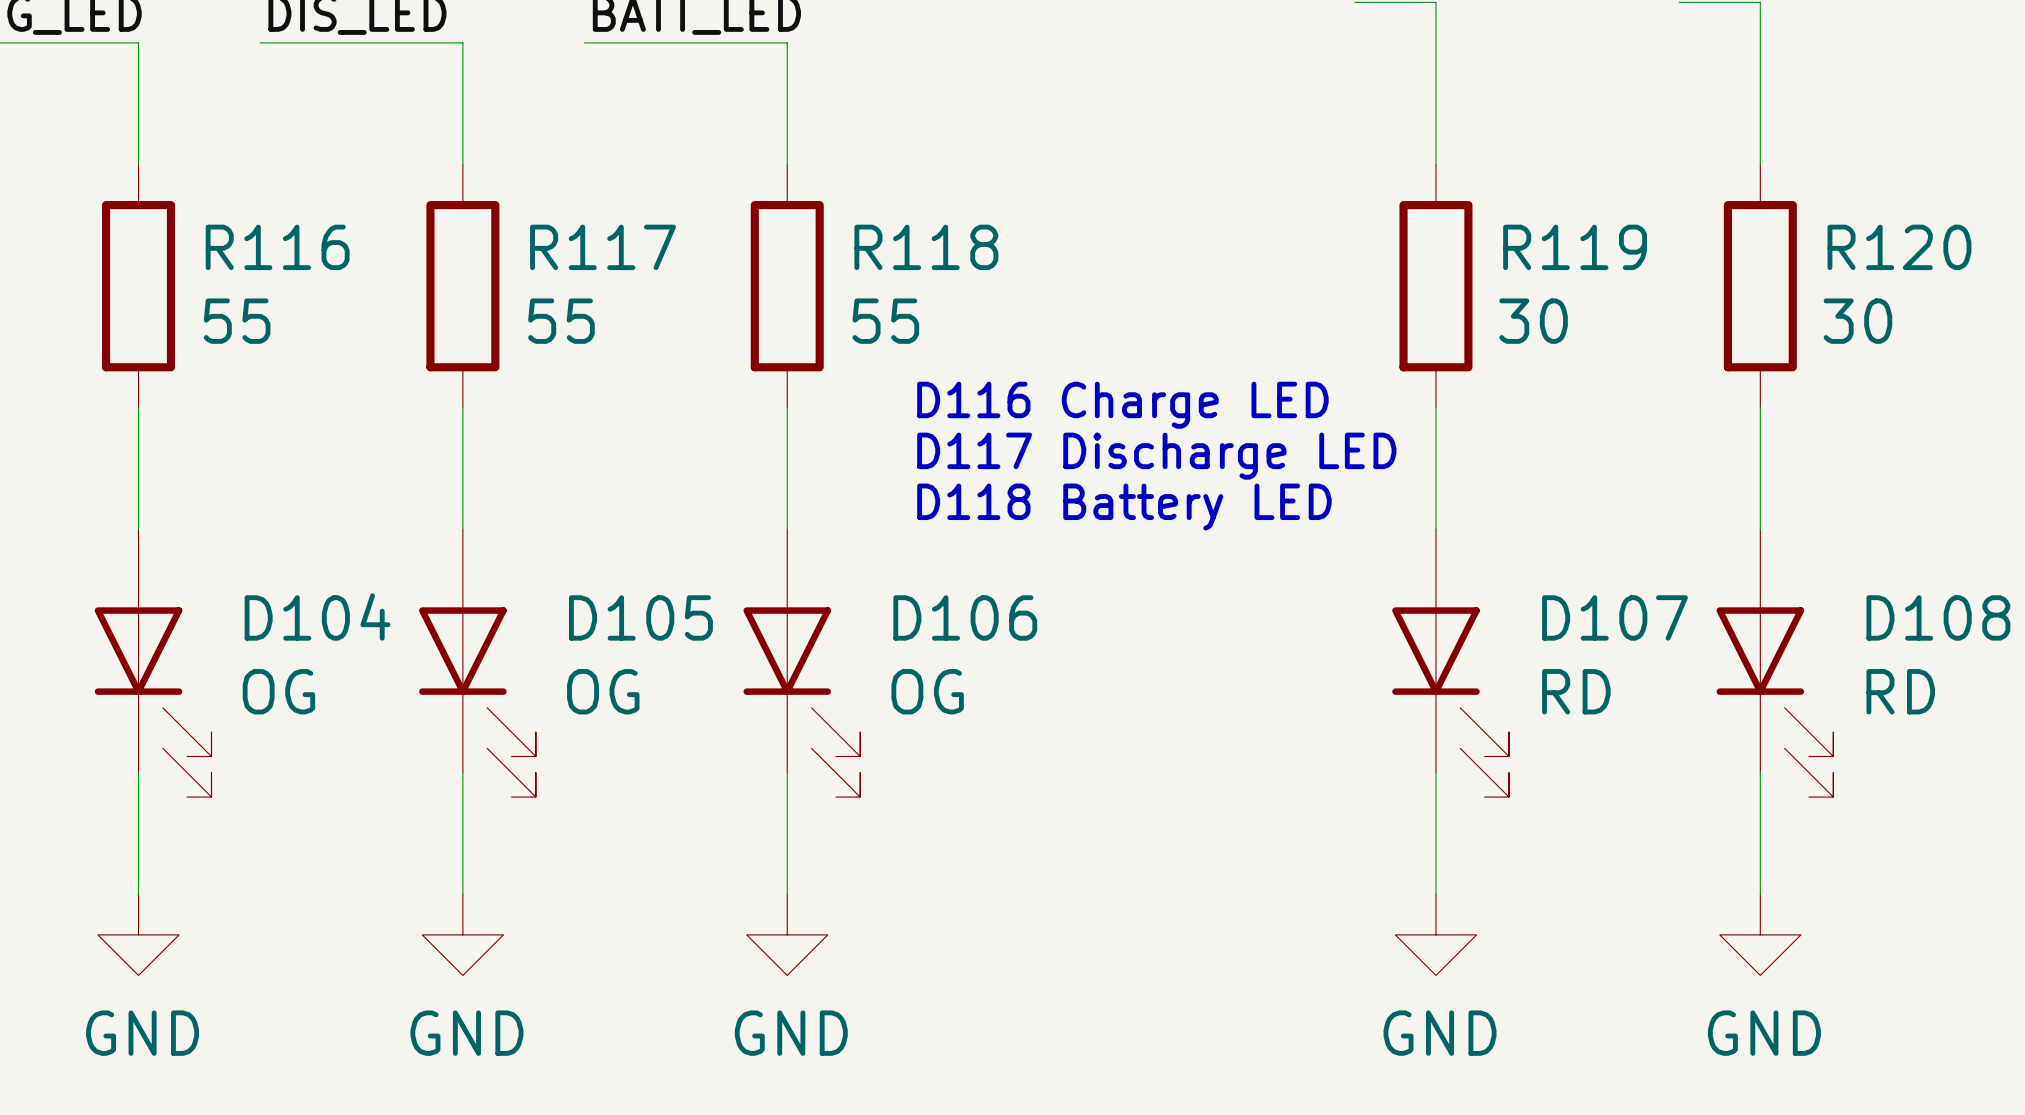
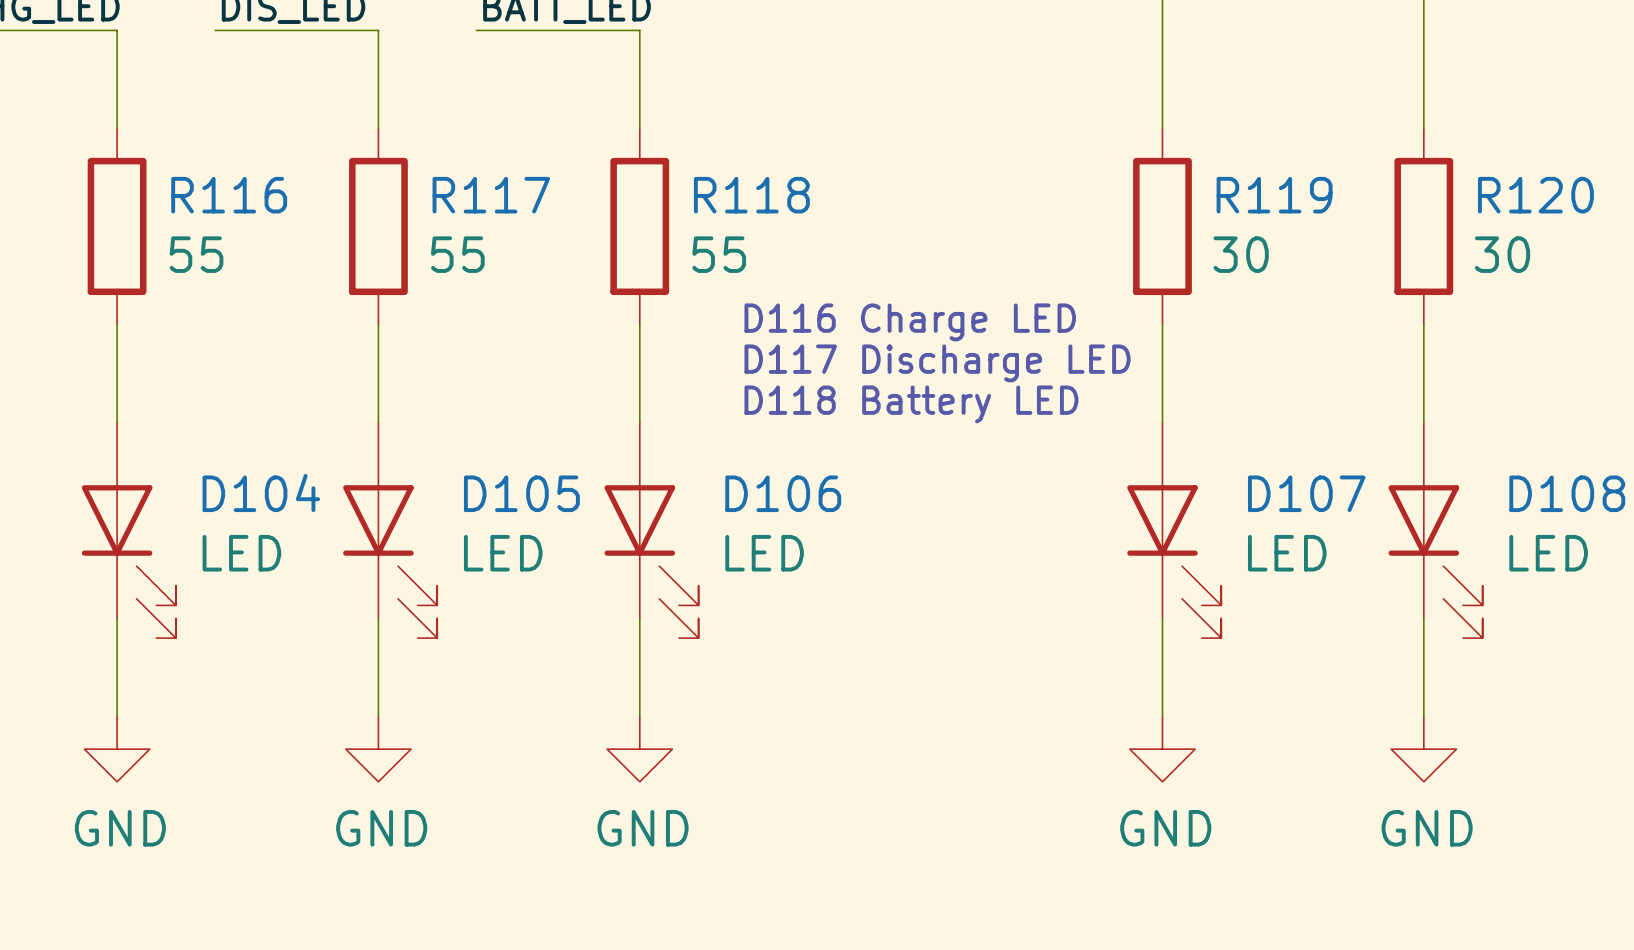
D104 value: OG (278, 691) -> LED (241, 553)
D105 value: OG (603, 691) -> LED (503, 553)
D106 value: OG (927, 691) -> LED (764, 553)
D107 value: RD (1576, 691) -> LED (1287, 553)
D108 value: RD (1900, 691) -> LED (1548, 553)

